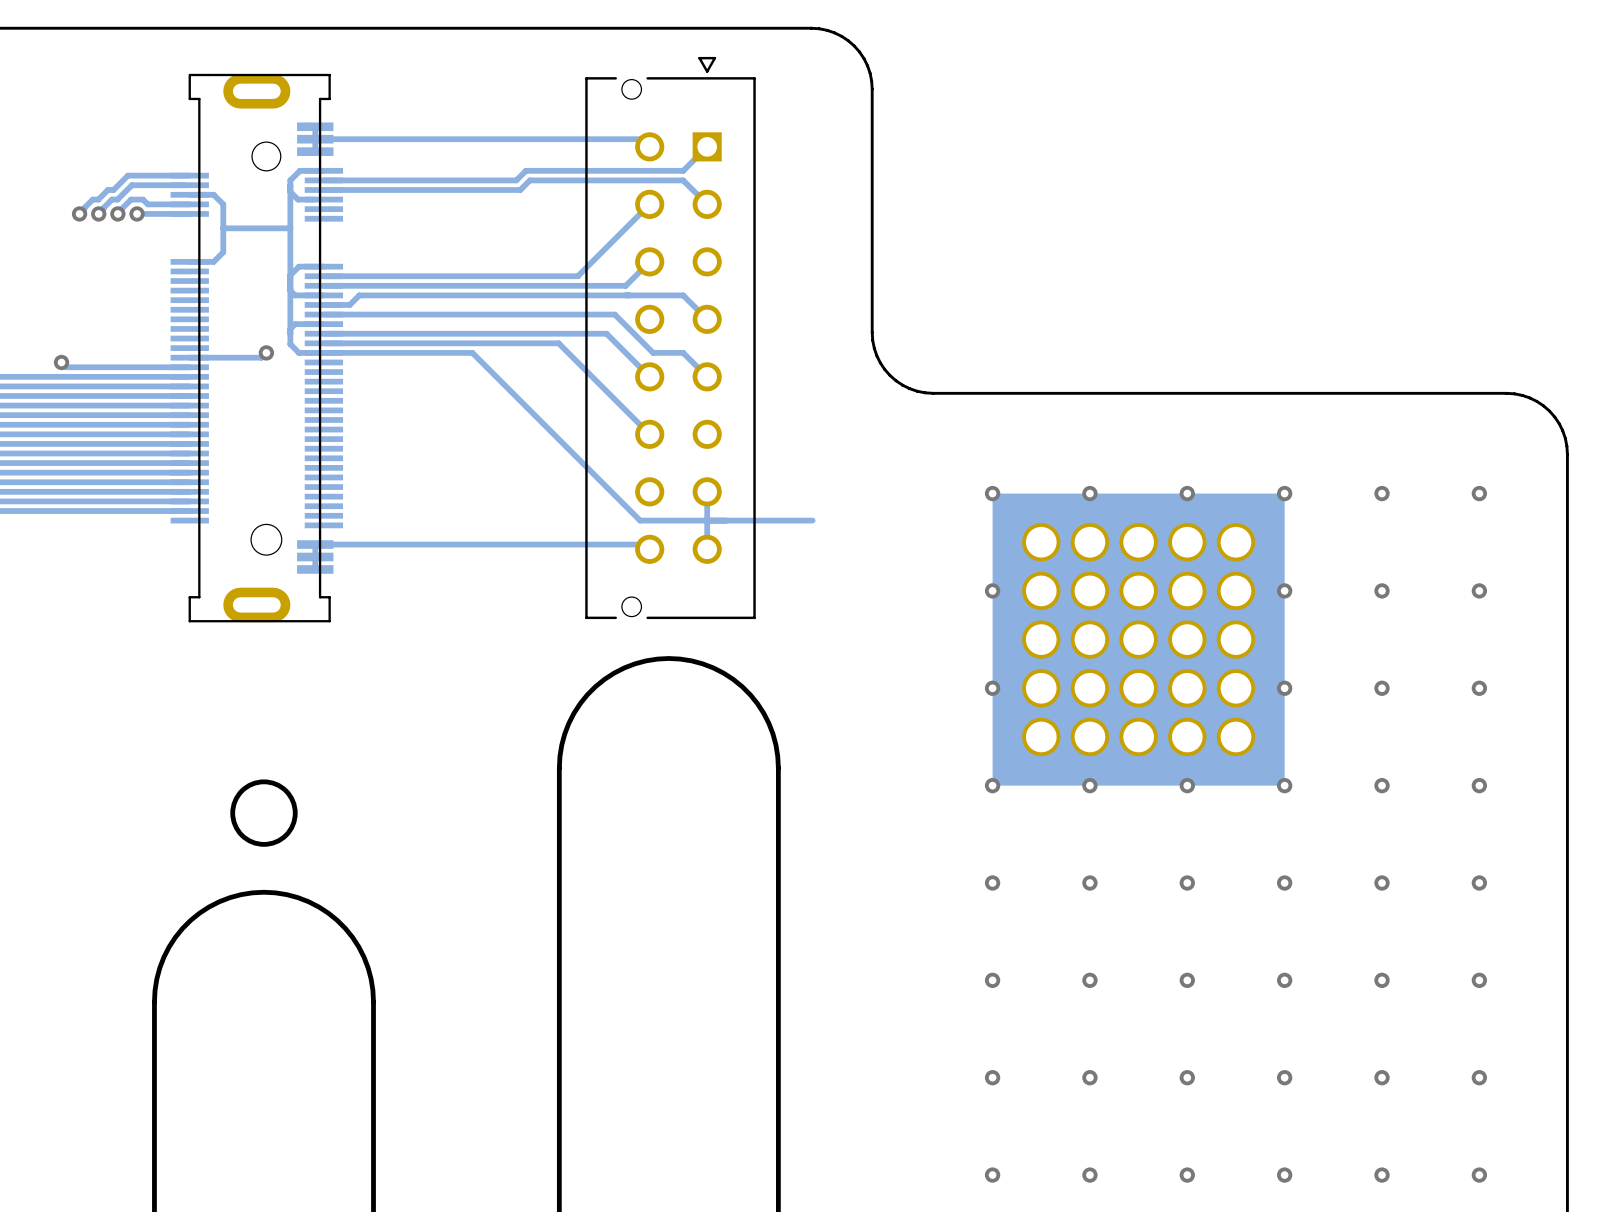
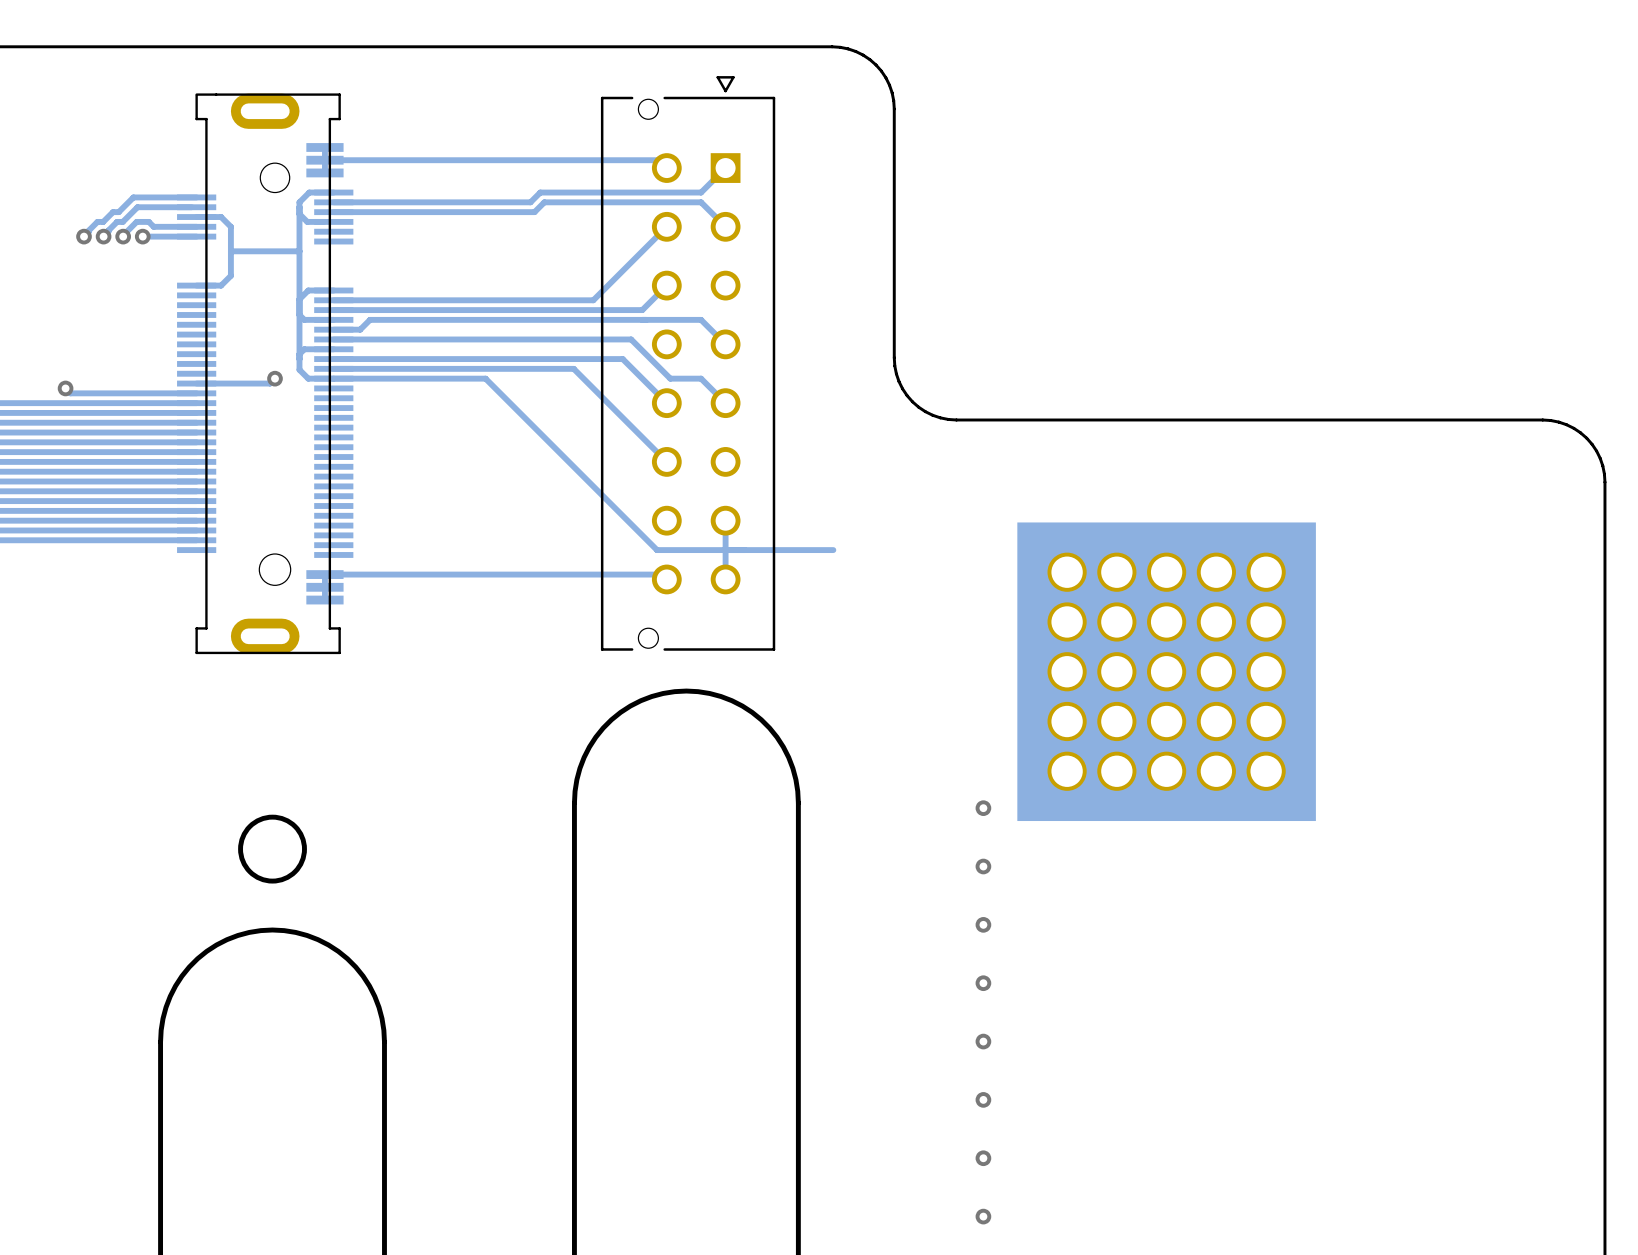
via: (992, 493) -> none
via: (1089, 493) -> none
via: (1187, 493) -> none
via: (1284, 493) -> none
via: (1382, 493) -> none
via: (1479, 493) -> none
via: (992, 590) -> none
via: (1284, 590) -> none
via: (1382, 590) -> none
via: (1479, 590) -> none
via: (992, 688) -> none
via: (1284, 688) -> none
via: (1382, 688) -> none
via: (1479, 688) -> none
via: none -> (983, 808)
via: (992, 785) -> none
via: (1089, 785) -> none
via: (1187, 785) -> none
via: (1284, 785) -> none
via: (1382, 785) -> none
via: (1479, 785) -> none
via: none -> (983, 866)
via: (992, 882) -> none
via: (1089, 882) -> none
via: (1187, 882) -> none
via: (1284, 882) -> none
via: (1382, 882) -> none
via: (1479, 882) -> none
via: none -> (983, 924)
via: none -> (983, 983)
via: (992, 980) -> none
via: (1089, 980) -> none
via: (1187, 980) -> none
via: (1284, 980) -> none
via: (1382, 980) -> none
via: (1479, 980) -> none
via: none -> (983, 1041)
via: none -> (983, 1099)
via: (992, 1077) -> none
via: (1089, 1077) -> none
via: (1187, 1077) -> none
via: (1284, 1077) -> none
via: (1382, 1077) -> none
via: (1479, 1077) -> none
via: none -> (983, 1158)
via: none -> (983, 1216)
via: (992, 1175) -> none
via: (1089, 1175) -> none
via: (1187, 1175) -> none
via: (1284, 1175) -> none
via: (1382, 1175) -> none
via: (1479, 1175) -> none

